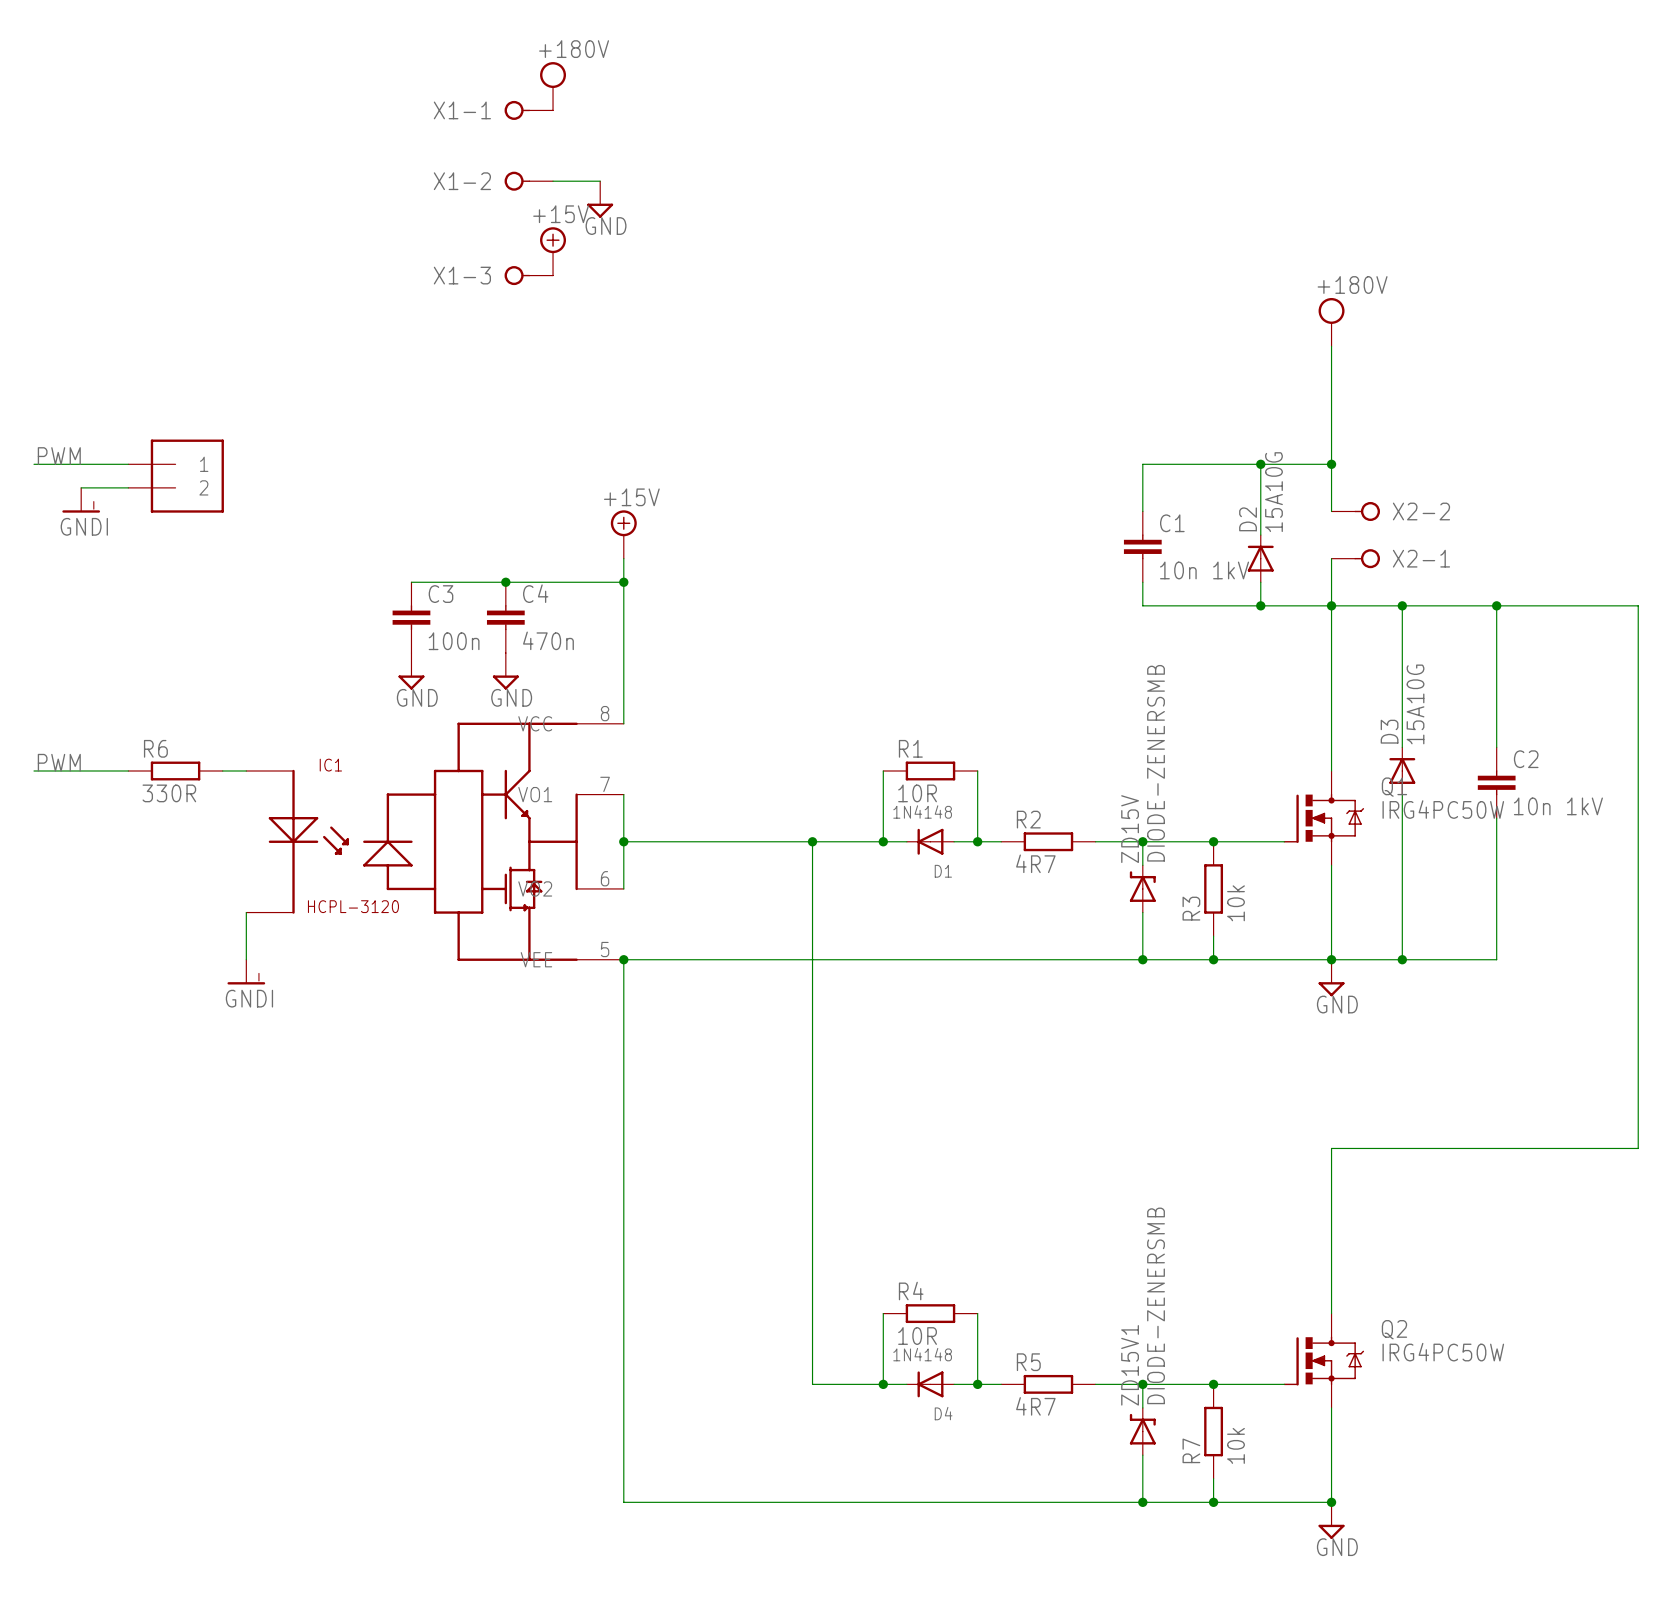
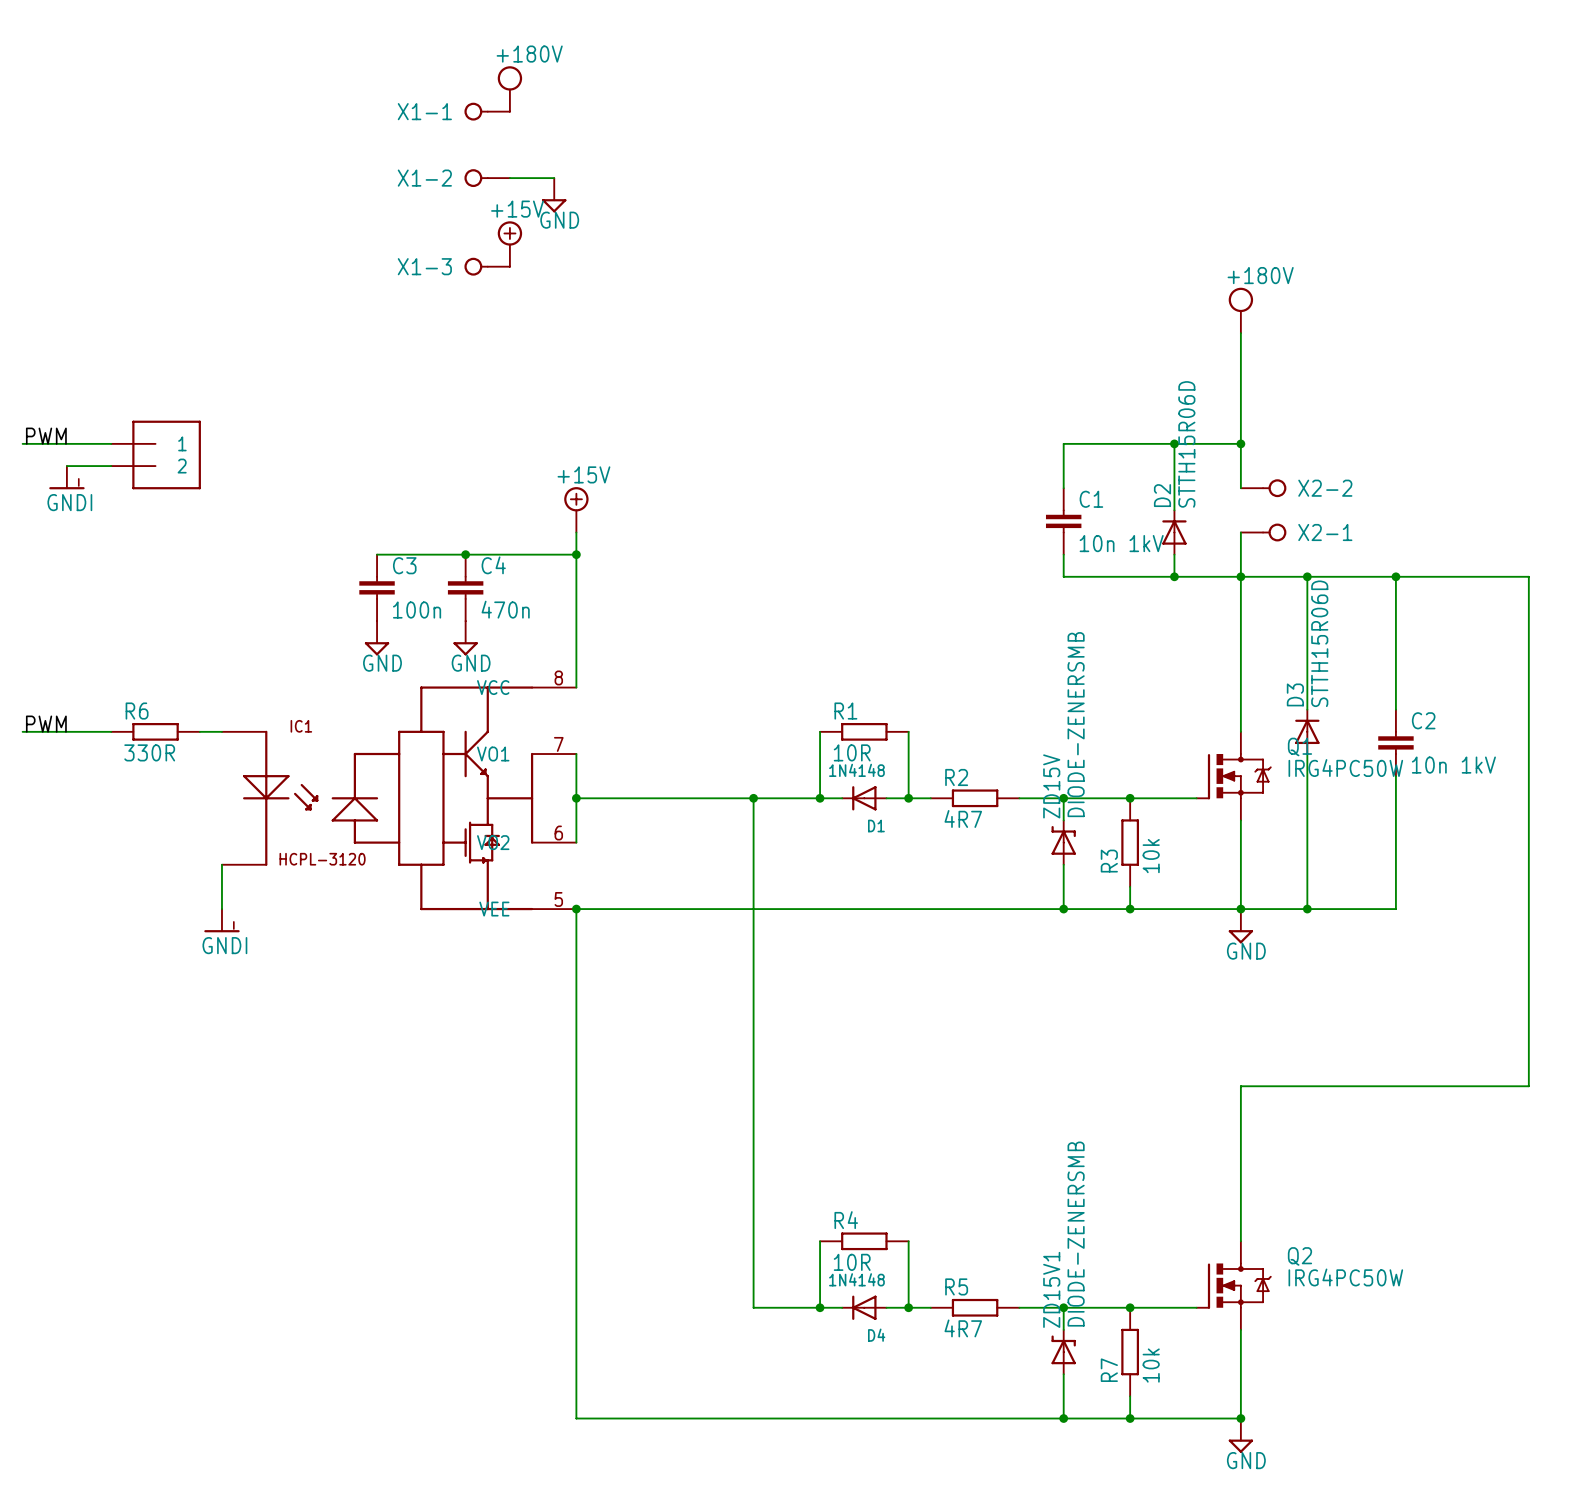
D2 value: 15A10G (1273, 492) -> STTH15R06D (1186, 444)
D3 value: 15A10G (1415, 704) -> STTH15R06D (1319, 643)

